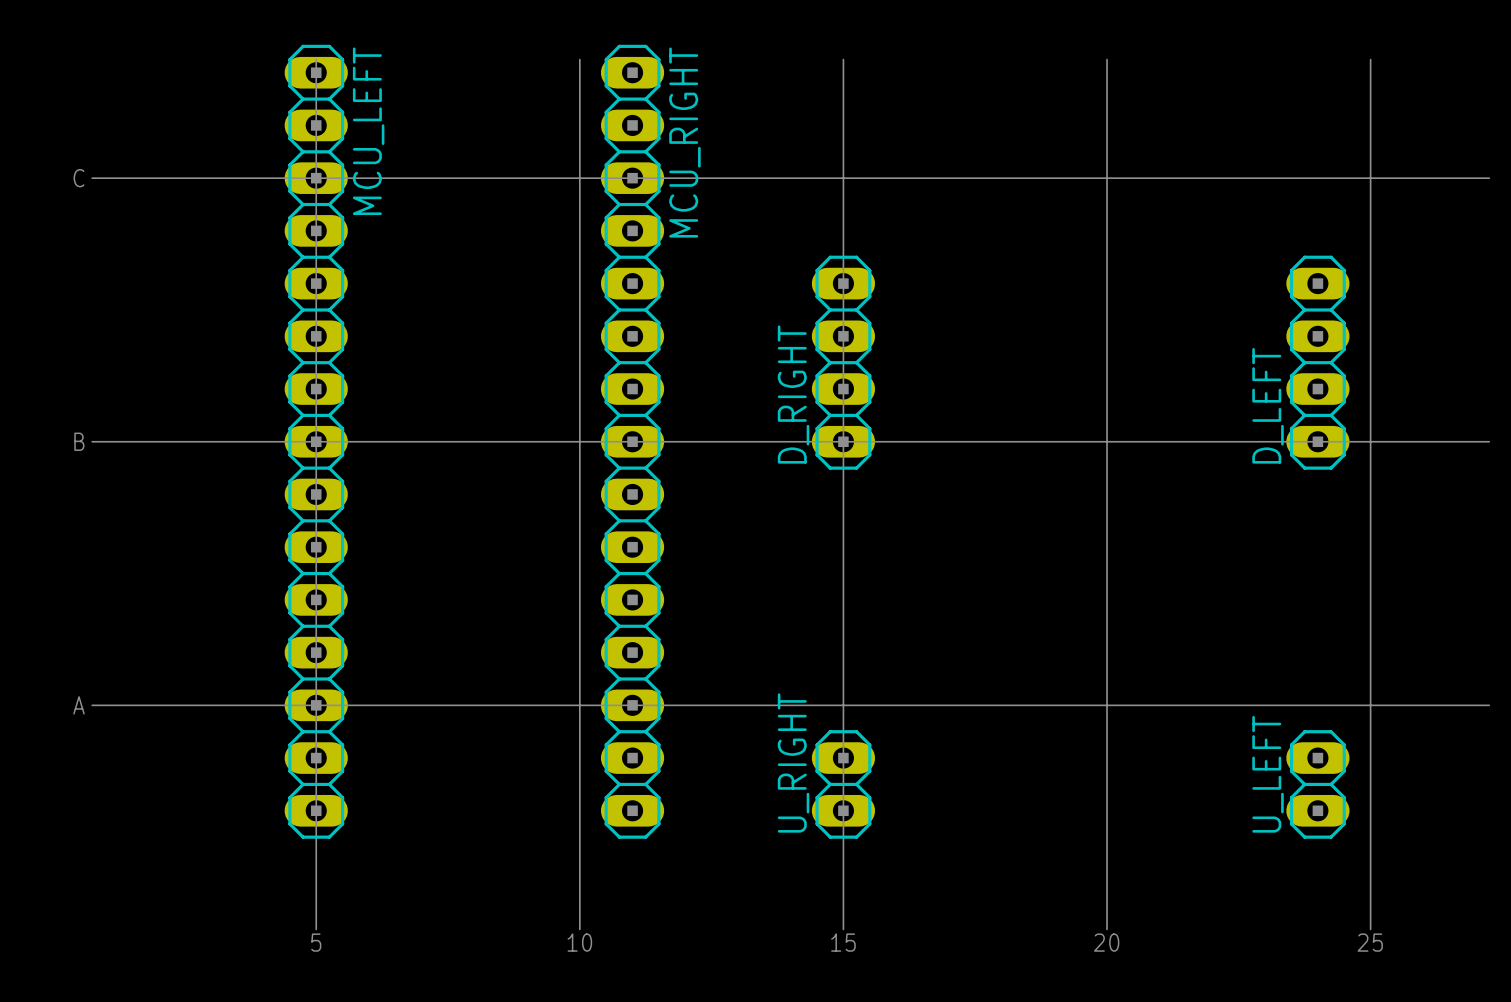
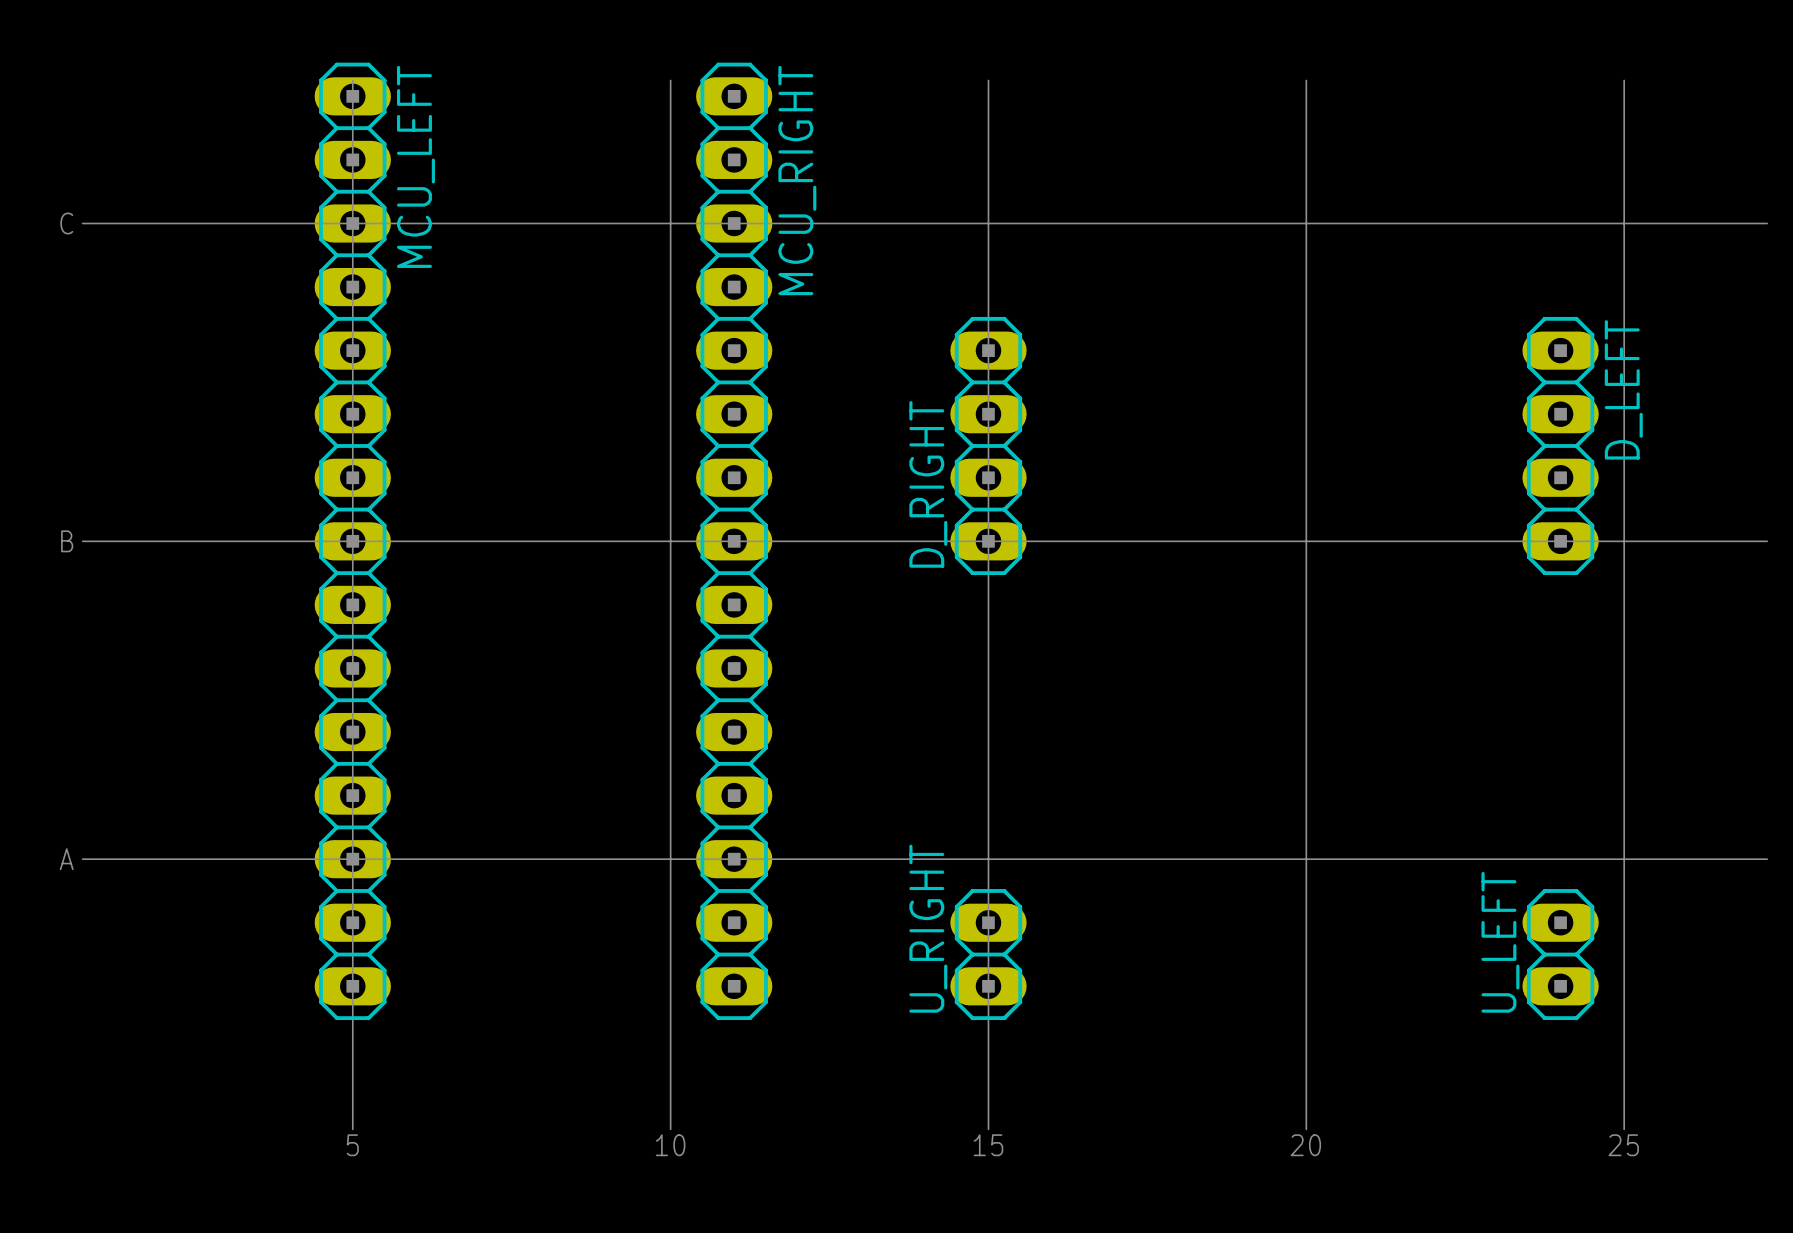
D_LEFT name position: D_LEFT (1268, 405) -> D_LEFT (1623, 389)

